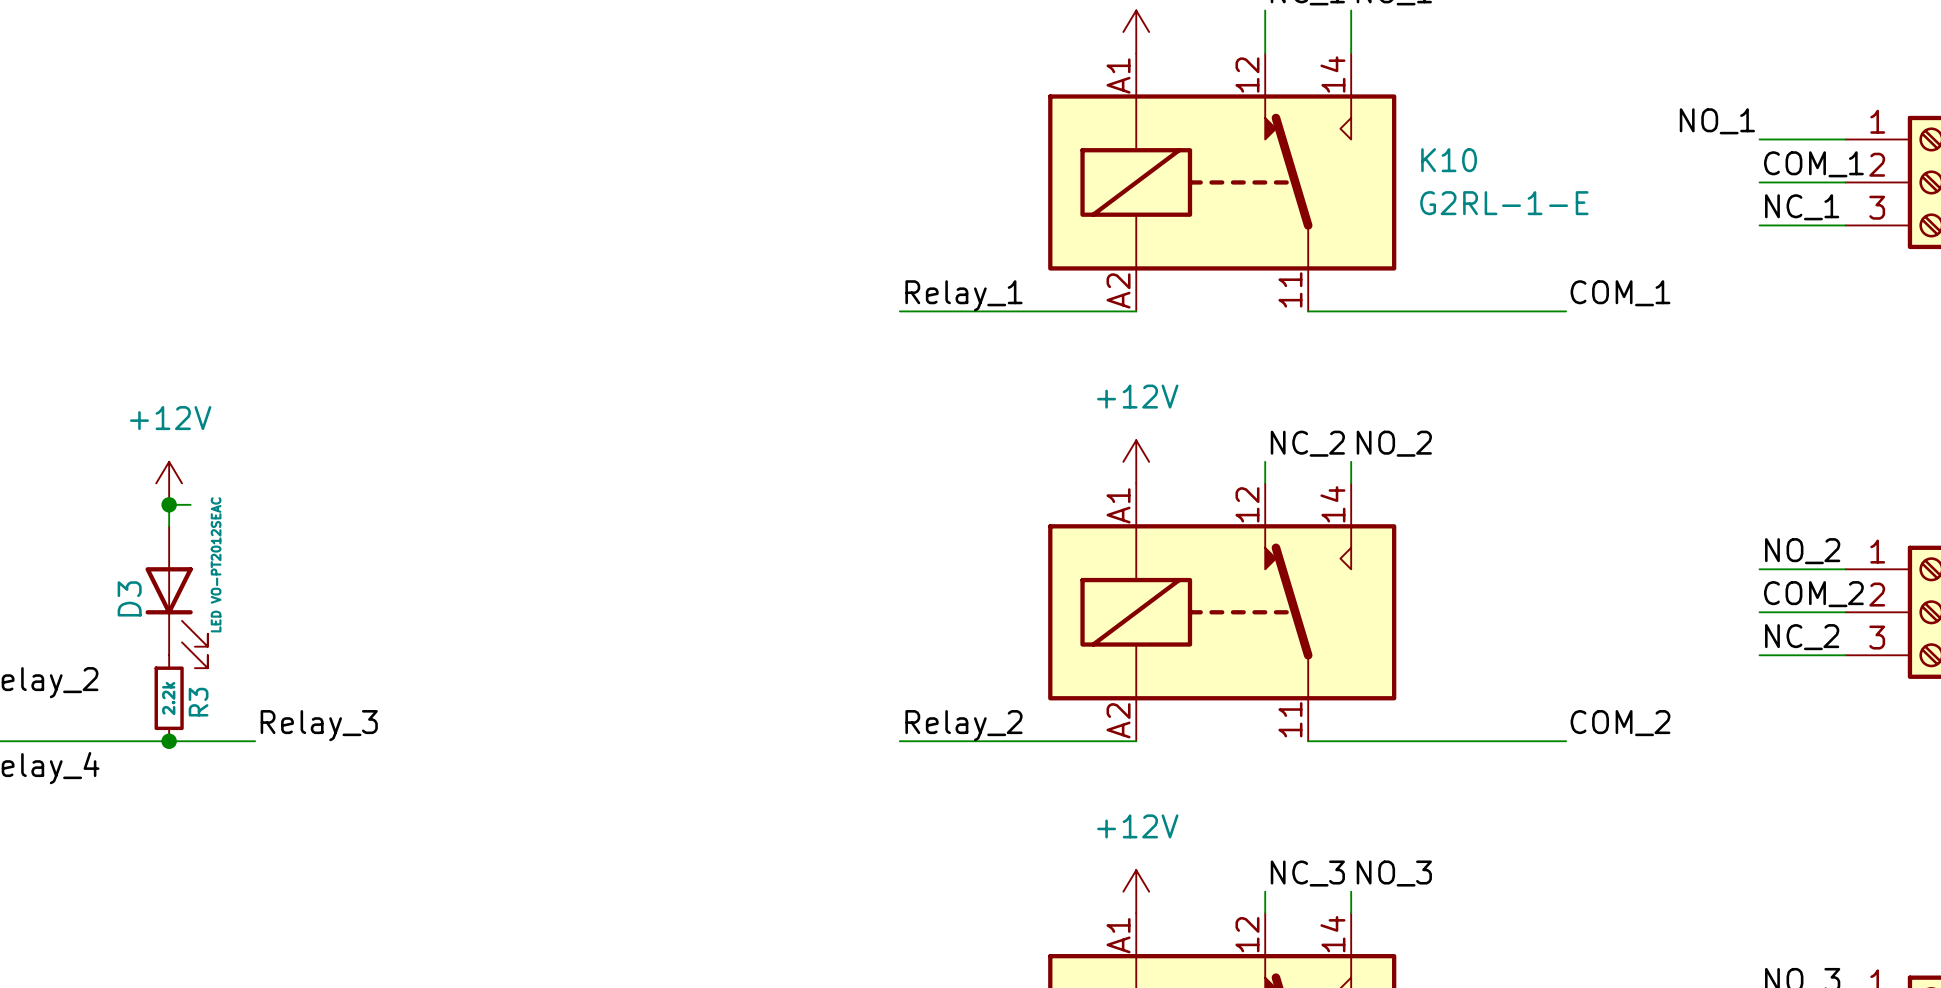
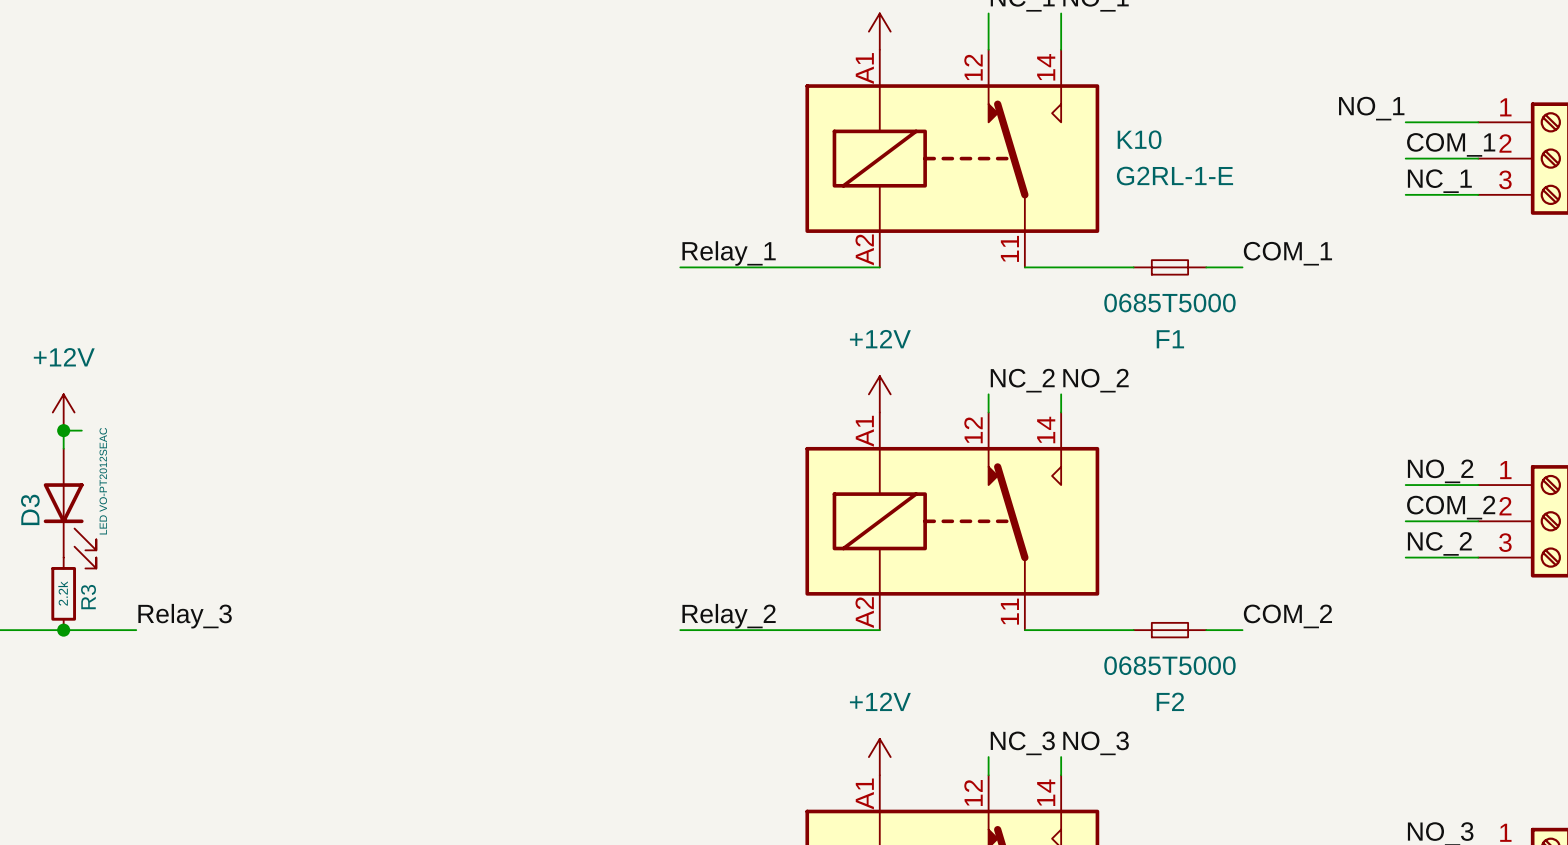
F1: none -> 0685T5000 (1169, 267)
F2: none -> 0685T5000 (1169, 630)

